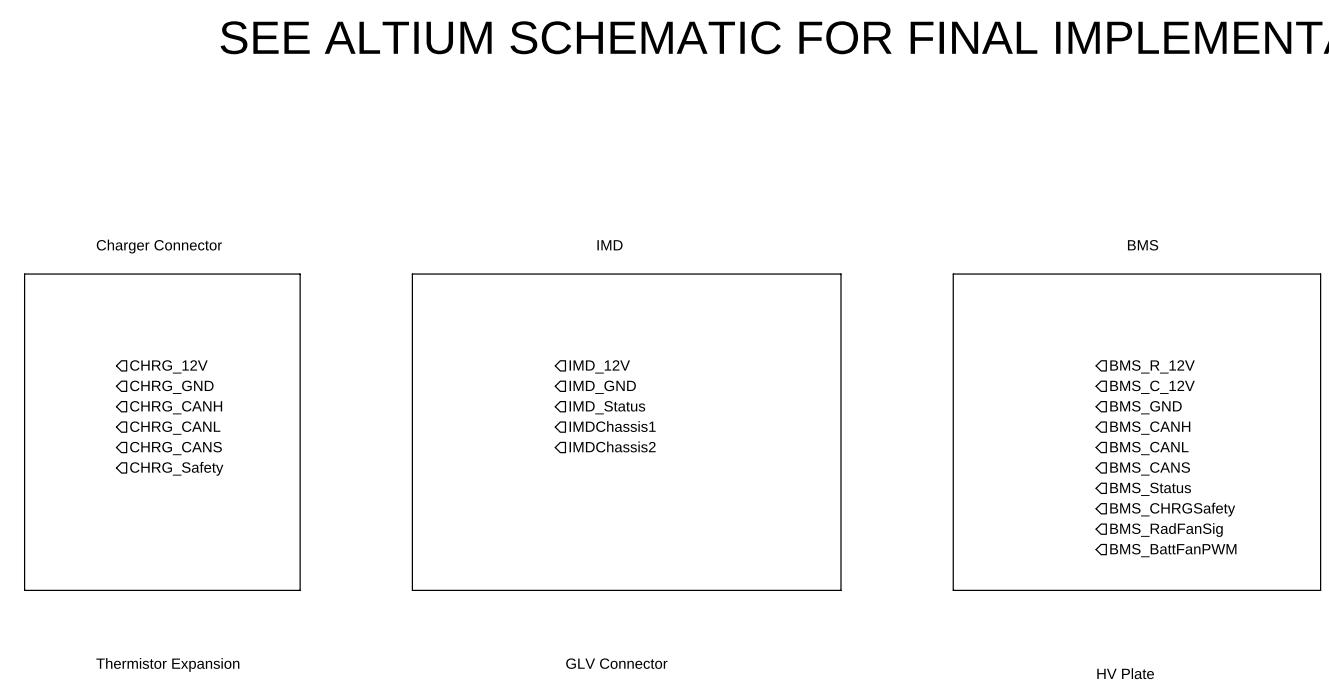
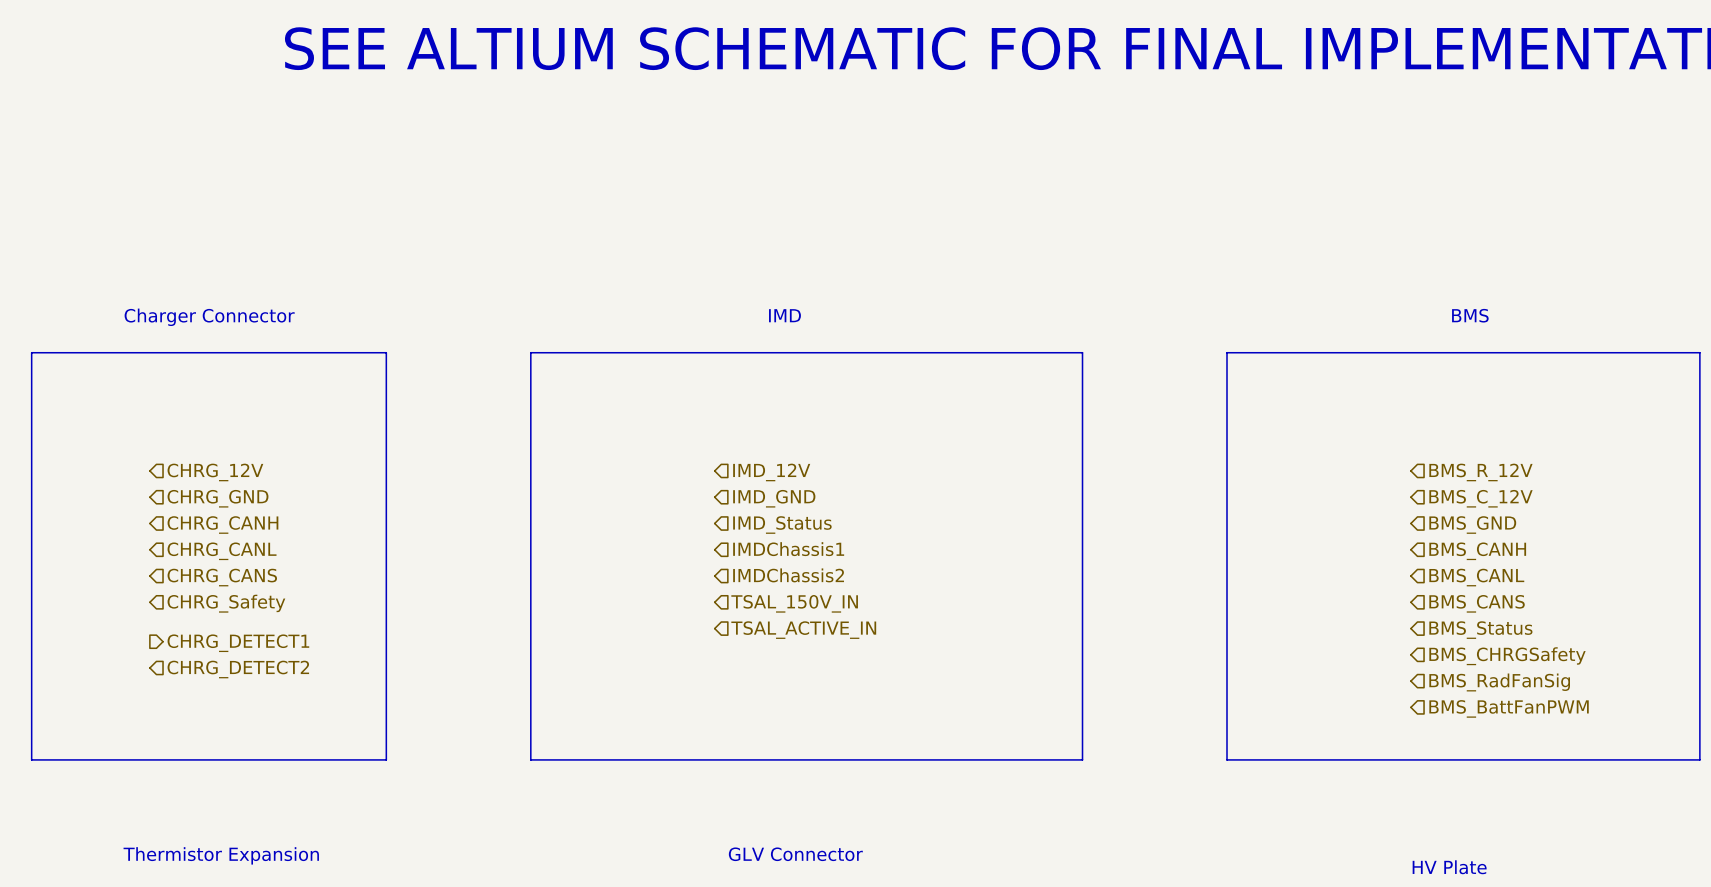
hierarchical label: none -> TSAL_150V_IN (794, 603)
hierarchical label: none -> TSAL_ACTIVE_IN (803, 630)
hierarchical label: none -> CHRG_DETECT1 (238, 643)
hierarchical label: none -> CHRG_DETECT2 (238, 669)

